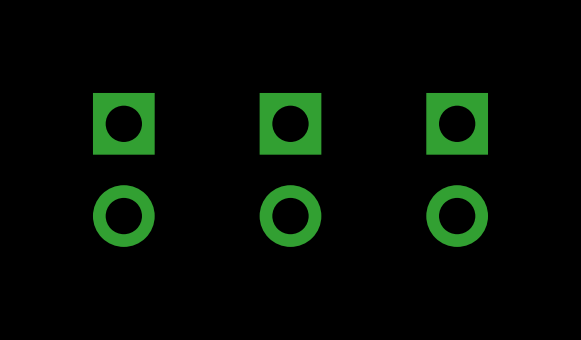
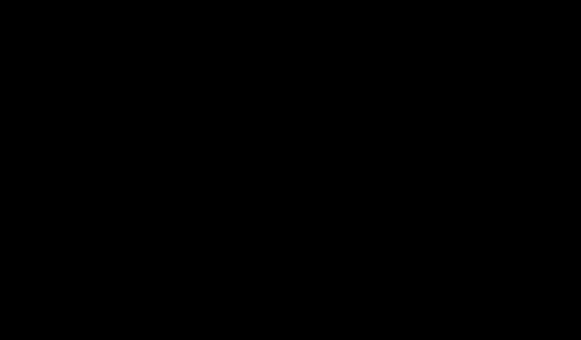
part: (123, 169) -> none
part: (290, 169) -> none
part: (457, 169) -> none

